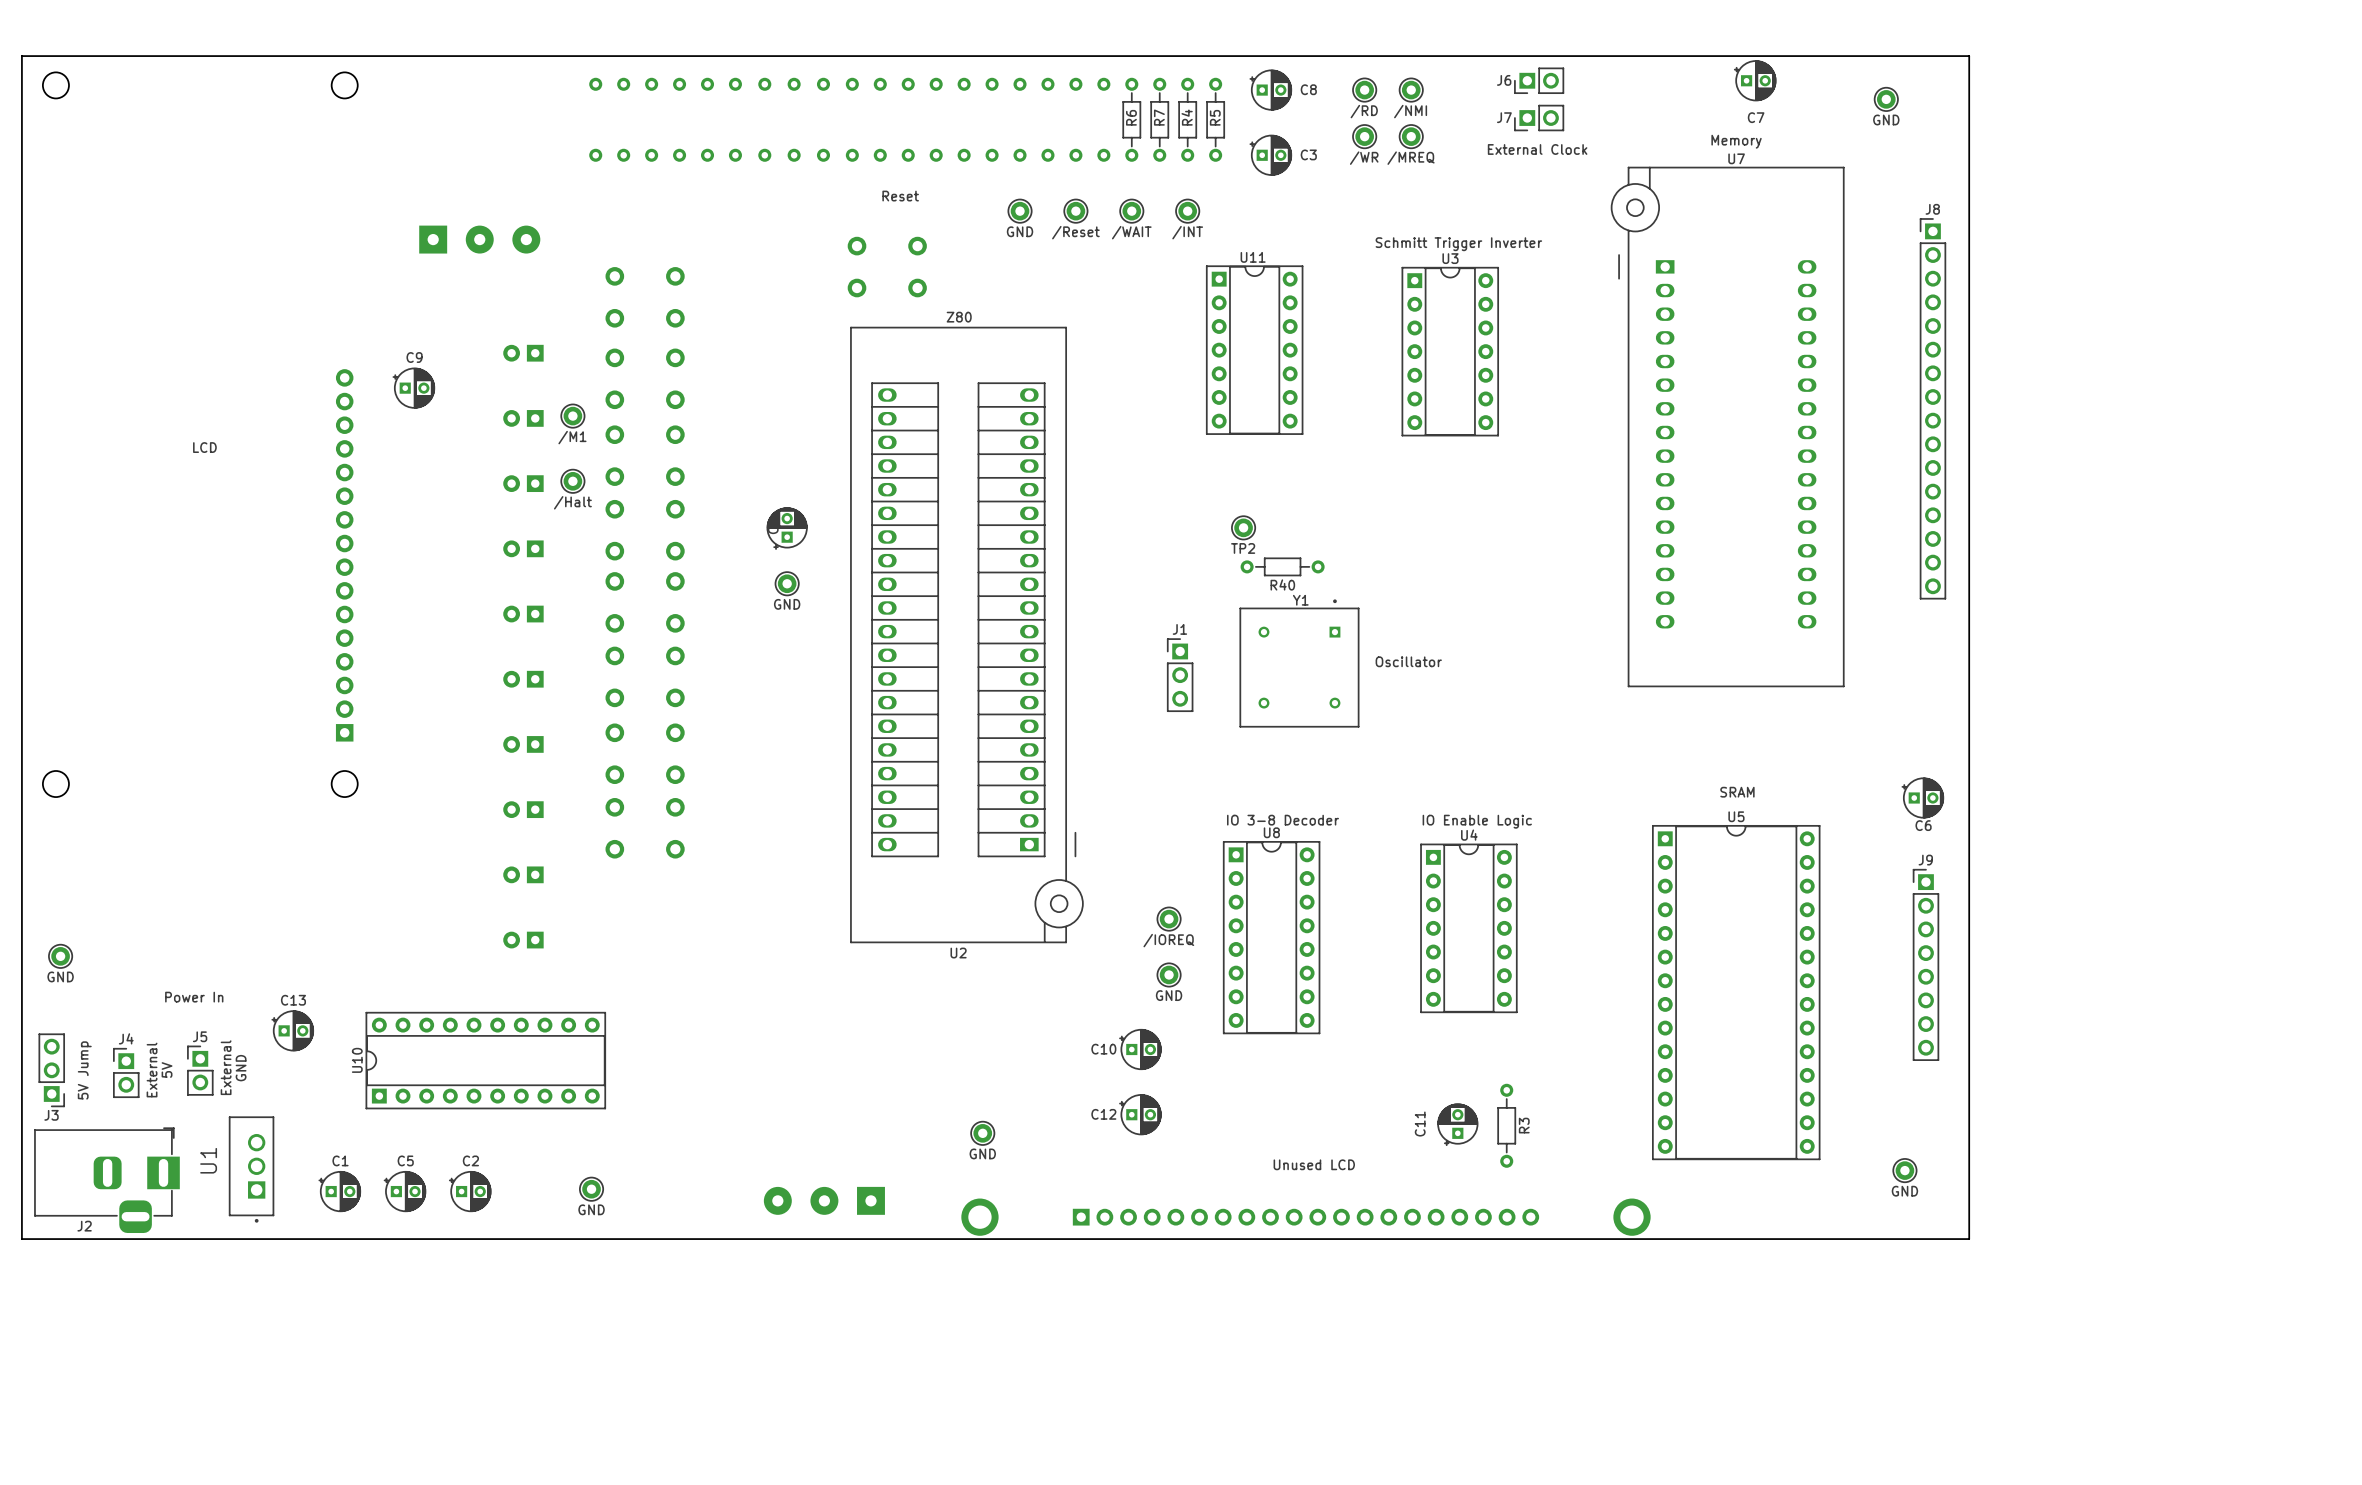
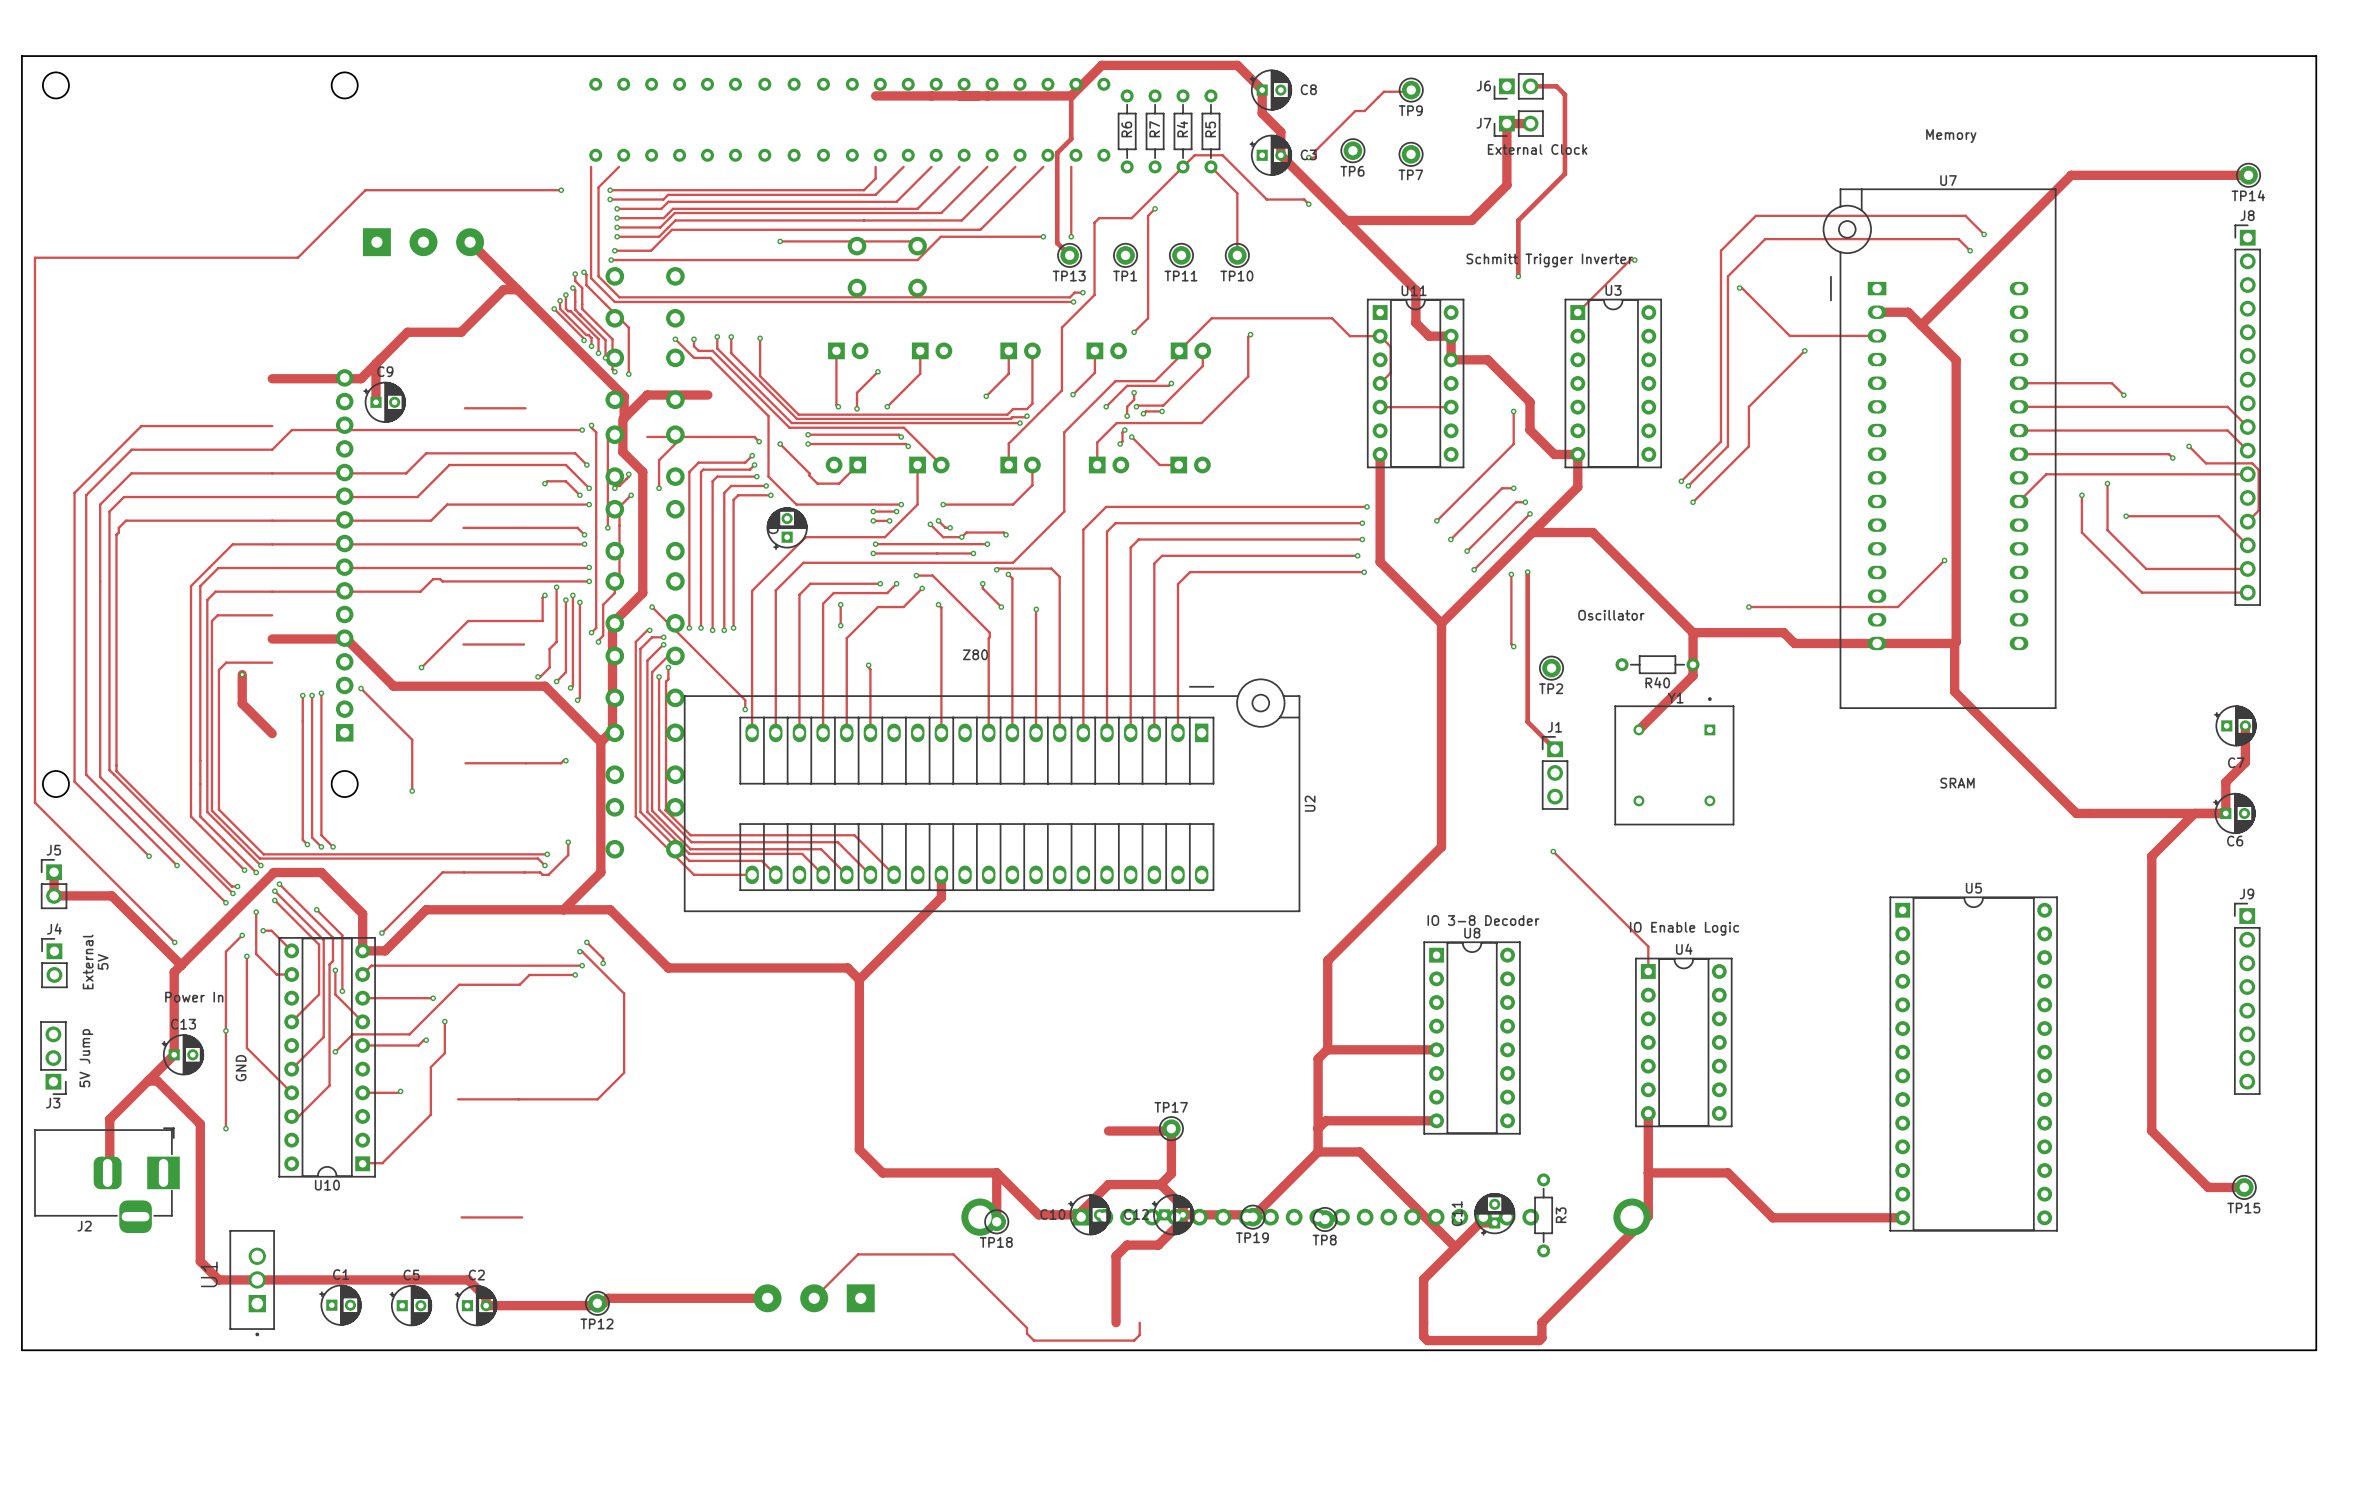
board edge: (1969, 56) (1969, 1239) (21, 1239) -> (1969, 56) (2316, 56) (2316, 1350) (21, 1350) (21, 1239)
J6 position: (1539, 80) -> (1518, 86)
C7 position: (1755, 80) -> (2235, 725)
track: none -> (1530, 86) (1556, 86) (1564, 94) (1564, 173) (1518, 220) (1518, 276)
/RD: (1364, 90) -> none
track: none -> (1409, 91) (1383, 91) (1364, 111) (1355, 111) (1315, 150) (1315, 157) (1308, 157)
track: none -> (875, 95) (1071, 95)
track: none -> (1071, 95) (1101, 65) (1237, 65) (1262, 90) (1262, 113) (1280, 131) (1280, 155) (1415, 290) (1415, 322) (1429, 336) (1451, 336) (1451, 359) (1487, 359) (1530, 402) (1530, 430) (1554, 454) (1577, 454) (1577, 487) (1441, 623)
track: none -> (1071, 95) (1071, 138) (1057, 152) (1057, 243) (1069, 255)
GND: (1886, 99) -> none
/NMI name: /NMI (1410, 111) -> TP9 (1410, 110)
J7 position: (1539, 118) -> (1518, 123)
R6 position: (1131, 119) -> (1127, 131)
R7 position: (1159, 119) -> (1155, 131)
R4 position: (1187, 119) -> (1183, 131)
R5 position: (1215, 119) -> (1210, 131)
track: none -> (1530, 123) (1506, 123) (1506, 185) (1471, 220) (1346, 220)
/WR: (1364, 136) -> none
/MREQ: (1411, 136) -> none
text position: Memory (1736, 141) -> Memory (1951, 136)
TP6: none -> (1352, 150)
TP7: none -> (1411, 154)
via: none -> (1308, 157)
track: none -> (591, 166) (591, 278) (614, 301) (1073, 301)
track: none -> (619, 166) (598, 187) (598, 276) (619, 297) (1070, 297) (1074, 292) (1082, 292)
track: none -> (875, 166) (875, 178) (864, 190) (610, 190)
track: none -> (903, 166) (875, 194) (668, 194) (663, 199) (610, 199)
track: none -> (931, 166) (896, 201) (668, 201) (661, 208) (617, 208)
track: none -> (959, 166) (917, 208) (673, 208) (663, 218) (617, 218)
track: none -> (987, 166) (941, 213) (674, 213) (660, 227) (617, 227)
track: none -> (1015, 166) (961, 220) (675, 220) (659, 236) (617, 236)
track: none -> (1043, 166) (980, 229) (671, 229) (651, 250) (614, 250)
track: none -> (1071, 166) (1071, 236)
track: none -> (1210, 166) (1237, 193) (1237, 255)
track: none -> (2248, 175) (2071, 175) (1921, 325)
TP14: none -> (2248, 175)
track: none -> (561, 190) (365, 190) (297, 257) (34, 257) (34, 802) (174, 942)
via: none -> (561, 190)
via: none -> (610, 190)
text: Reset (900, 196) -> none
via: none -> (610, 199)
track: none -> (1308, 204) (1304, 199) (1266, 199) (1222, 155) (1194, 155) (1131, 218) (1099, 218) (1094, 222) (1094, 295) (1061, 327) (1061, 390) (1008, 443) (1008, 464)
via: none -> (1308, 204)
via: none -> (617, 208)
track: none -> (1155, 208) (1148, 215) (1148, 318) (1134, 332)
via: none -> (1155, 208)
GND: (1020, 211) -> none
/Reset: (1075, 211) -> none
/WAIT: (1131, 211) -> none
/INT: (1187, 211) -> none
via: none -> (617, 218)
via: none -> (617, 227)
track: none -> (1984, 234) (1965, 215) (1755, 215) (1720, 250) (1720, 441) (1681, 481)
via: none -> (1984, 234)
via: none -> (617, 236)
track: none -> (1043, 236) (940, 236) (917, 260) (610, 260)
via: none -> (1043, 236)
via: none -> (1071, 236)
part position: (479, 239) -> (423, 242)
track: none -> (780, 241) (922, 241)
via: none -> (780, 241)
track: none -> (470, 242) (624, 396) (624, 418) (647, 395) (707, 395)
text position: Schmitt Trigger Inverter (1458, 244) -> Schmitt Trigger Inverter (1549, 260)
via: none -> (614, 250)
track: none -> (1970, 250) (1958, 239) (1765, 239) (1727, 276) (1727, 446) (1688, 485)
via: none -> (1970, 250)
TP13: none -> (1069, 255)
TP1: none -> (1125, 255)
TP11: none -> (1181, 255)
TP10: none -> (1237, 255)
via: none -> (611, 260)
track: none -> (1634, 260) (1630, 260) (1577, 312)
via: none -> (1634, 260)
track: none -> (583, 272) (586, 274) (586, 285) (628, 327) (628, 374)
via: none -> (583, 272)
track: none -> (575, 274) (575, 281) (582, 288) (582, 308) (612, 339) (612, 369) (614, 371)
via: none -> (575, 274)
via: none -> (1518, 276)
track: none -> (572, 288) (575, 290) (575, 309) (605, 340) (605, 357)
via: none -> (572, 288)
track: none -> (1739, 288) (1741, 288) (1789, 335) (1877, 335)
via: none -> (1739, 288)
track: none -> (517, 289) (503, 289) (461, 332) (407, 332) (361, 378) (272, 378)
via: none -> (1082, 292)
track: none -> (565, 295) (565, 308) (598, 339) (598, 353)
via: none -> (565, 295)
track: none -> (560, 300) (560, 308) (591, 337) (591, 346)
via: none -> (560, 300)
via: none -> (1073, 301)
track: none -> (554, 308) (584, 340)
via: none -> (554, 308)
track: none -> (1877, 312) (1908, 312) (1956, 360) (1954, 643)
text: Z80 (959, 317) -> none
via: none -> (1134, 332)
track: none -> (1250, 334) (1248, 336) (1248, 376) (1201, 423) (1116, 423) (1097, 442) (1097, 464)
via: none -> (1250, 334)
track: none -> (717, 336) (717, 348) (791, 423) (1020, 423)
via: none -> (717, 336)
track: none -> (731, 336) (731, 353) (796, 418) (1010, 418) (1027, 416)
via: none -> (731, 336)
track: none -> (760, 338) (760, 376) (798, 414) (1007, 414) (1013, 409) (1027, 409) (1032, 403) (1032, 350)
via: none -> (760, 338)
track: none -> (675, 339) (694, 357) (710, 357) (768, 416) (768, 476) (796, 504) (901, 504)
via: none -> (675, 339)
track: none -> (694, 339) (694, 346) (698, 350) (712, 350) (789, 427) (903, 427) (941, 464)
via: none -> (694, 339)
via: none -> (584, 340)
via: none -> (591, 346)
track: none -> (836, 350) (836, 404) (838, 406)
part: none -> (848, 350)
track: none -> (920, 350) (920, 373) (887, 406)
part: none -> (932, 350)
track: none -> (1008, 350) (1008, 373) (986, 396)
part: none -> (1020, 350)
track: none -> (1094, 350) (1094, 372) (1073, 394)
part: none -> (1106, 350)
part: none -> (1190, 350)
track: none -> (1202, 350) (1202, 366) (1163, 405) (1136, 406)
U11 position: (1254, 350) -> (1415, 383)
track: none -> (1804, 350) (1748, 406) (1748, 446) (1693, 502)
via: none -> (1804, 350)
U3 position: (1450, 351) -> (1613, 383)
part: (523, 353) -> none
via: none -> (598, 353)
via: none -> (605, 357)
track: none -> (375, 363) (375, 402)
via: none -> (614, 371)
track: none -> (877, 371) (857, 392) (857, 408)
via: none -> (877, 371)
via: none -> (628, 374)
track: none -> (1171, 383) (1169, 385) (1127, 385) (1106, 406)
via: none -> (1171, 383)
track: none -> (1380, 383) (1390, 373) (1390, 346) (1380, 336) (1349, 336) (1332, 318) (1211, 318) (1179, 350) (1179, 357) (1155, 381) (1115, 381) (1064, 432) (1064, 511) (1013, 562) (803, 562) (775, 590) (775, 732)
track: none -> (2019, 383) (2111, 383) (2123, 395)
C9 position: (413, 388) -> (384, 402)
track: none -> (1134, 392) (1134, 399) (1127, 406) (1127, 416)
via: none -> (1134, 392)
via: none -> (1073, 394)
via: none -> (2123, 395)
via: none -> (986, 396)
via: none -> (838, 406)
via: none -> (887, 406)
via: none -> (1106, 406)
via: none -> (1136, 406)
track: none -> (2019, 406) (2227, 406) (2247, 426)
track: none -> (1380, 407) (1451, 407)
track: none -> (464, 408) (525, 408)
via: none -> (857, 408)
J8 position: (1932, 408) -> (2247, 415)
track: none -> (1162, 411) (1145, 411) (1143, 413)
via: none -> (1162, 411)
track: none -> (1513, 411) (1513, 444) (1436, 520)
via: none -> (1513, 411)
via: none -> (1143, 413)
/M1: (572, 416) -> none
via: none -> (1027, 416)
via: none -> (1127, 416)
part: (523, 418) -> none
track: none -> (622, 419) (622, 452) (642, 471) (642, 593) (612, 623) (612, 730) (600, 742)
via: none -> (1020, 423)
track: none -> (591, 425) (596, 432) (596, 628) (591, 632)
via: none -> (591, 425)
track: none -> (272, 426) (141, 426) (74, 492) (74, 781) (149, 856)
U7 position: (1727, 426) -> (1939, 448)
track: none -> (582, 430) (291, 430) (272, 449) (131, 449) (86, 495) (86, 774) (177, 865)
via: none -> (582, 430)
track: none -> (1124, 430) (1120, 444)
via: none -> (1124, 430)
track: none -> (2019, 430) (2227, 430) (2247, 450)
track: none -> (607, 432) (607, 527)
track: none -> (808, 434) (898, 434) (901, 437)
via: none -> (808, 434)
track: none -> (647, 436) (754, 436) (759, 441)
track: none -> (682, 436) (659, 460) (659, 488)
via: none -> (901, 437)
track: none -> (1131, 437) (1159, 464) (1178, 464)
via: none -> (1131, 437)
via: none -> (759, 441)
track: none -> (780, 444) (817, 483) (839, 483) (857, 464)
via: none -> (780, 444)
track: none -> (808, 444) (905, 444) (908, 446)
via: none -> (808, 444)
via: none -> (1120, 444)
via: none -> (908, 446)
track: none -> (2189, 446) (2206, 463) (2252, 463) (2258, 469) (2258, 510) (2247, 521)
via: none -> (2189, 446)
text: LCD (204, 447) -> none
track: none -> (1380, 454) (1380, 561) (1441, 623)
track: none -> (2019, 454) (2168, 454) (2172, 458)
track: none -> (752, 455) (745, 462) (698, 462) (689, 471) (689, 628)
via: none -> (752, 455)
via: none -> (2172, 458)
track: none -> (586, 464) (575, 453) (426, 453) (406, 473) (131, 473) (100, 504) (100, 777) (225, 902)
via: none -> (586, 464)
track: none -> (754, 464) (749, 469) (703, 469) (700, 471) (700, 628)
via: none -> (754, 464)
part: none -> (845, 464)
track: none -> (917, 464) (917, 504) (884, 537) (805, 537) (752, 590) (752, 732)
part: none -> (929, 464)
part: none -> (1020, 464)
track: none -> (1032, 464) (1032, 485) (1013, 504) (943, 504)
part: none -> (1109, 464)
part: none -> (1190, 464)
track: none -> (628, 474) (628, 476) (614, 488)
via: none -> (628, 474)
track: none -> (2247, 474) (2046, 474) (2019, 501)
track: none -> (756, 476) (717, 476) (712, 481) (712, 630)
via: none -> (756, 476)
/Halt: (572, 481) -> none
via: none -> (1681, 481)
part: (523, 483) -> none
track: none -> (544, 483) (547, 481) (565, 481) (579, 495)
via: none -> (544, 483)
track: none -> (2107, 483) (2107, 530) (2146, 568) (2247, 568)
via: none -> (2107, 483)
track: none -> (766, 485) (731, 485) (724, 492) (724, 630)
via: none -> (766, 485)
via: none -> (1688, 485)
track: none -> (589, 488) (565, 464) (449, 464) (417, 497) (124, 497) (109, 511) (109, 770) (232, 893)
via: none -> (589, 488)
via: none -> (614, 488)
via: none -> (659, 488)
track: none -> (1513, 488) (1502, 488) (1450, 539)
via: none -> (1513, 488)
via: none -> (579, 495)
track: none -> (631, 495) (619, 506) (619, 583) (614, 588) (614, 593) (603, 604) (603, 635) (598, 641)
via: none -> (631, 495)
track: none -> (770, 495) (738, 495) (733, 499) (733, 628)
via: none -> (770, 495)
track: none -> (2081, 495) (2081, 532) (2141, 592) (2247, 592)
via: none -> (2081, 495)
track: none -> (1525, 502) (1516, 502) (1467, 551)
via: none -> (1525, 502)
via: none -> (1693, 502)
track: none -> (589, 504) (447, 504) (431, 520) (125, 520) (118, 527) (116, 534) (116, 771) (231, 886) (237, 886)
via: none -> (589, 504)
via: none -> (901, 504)
via: none -> (943, 504)
track: none -> (1367, 506) (1106, 506) (1083, 529) (1083, 732)
via: none -> (1367, 506)
track: none -> (873, 511) (896, 511)
via: none -> (873, 511)
via: none -> (896, 511)
track: none -> (1530, 513) (1474, 569)
via: none -> (1530, 513)
track: none -> (2126, 516) (2218, 516) (2247, 545)
via: none -> (2126, 516)
track: none -> (873, 520) (889, 520)
via: none -> (873, 520)
via: none -> (889, 520)
track: none -> (938, 520) (945, 527) (950, 527)
via: none -> (938, 520)
via: none -> (1436, 520)
track: none -> (1362, 523) (1115, 523) (1107, 531) (1107, 732)
via: none -> (1362, 523)
track: none -> (930, 524) (943, 537) (961, 537) (966, 532) (1003, 532) (1006, 534)
via: none -> (930, 524)
track: none -> (463, 527) (577, 527) (584, 534)
via: none -> (607, 527)
via: none -> (950, 527)
TP2 position: (1243, 527) -> (1551, 668)
track: none -> (1532, 532) (1592, 532) (1693, 632)
via: none -> (584, 534)
via: none -> (1006, 534)
via: none -> (961, 537)
track: none -> (1362, 539) (1138, 539) (1130, 547) (1130, 732)
via: none -> (1362, 539)
via: none -> (1450, 539)
track: none -> (584, 544) (232, 544) (191, 586) (191, 816) (244, 870)
via: none -> (584, 544)
track: none -> (875, 544) (987, 544)
via: none -> (875, 544)
via: none -> (987, 544)
part: (523, 548) -> none
via: none -> (1467, 551)
track: none -> (873, 553) (973, 553)
via: none -> (873, 553)
via: none -> (973, 553)
track: none -> (1357, 555) (1162, 555) (1154, 563) (1154, 732)
via: none -> (1357, 555)
track: none -> (1944, 560) (1897, 607) (1748, 607)
via: none -> (1944, 560)
R40 position: (1282, 566) -> (1657, 664)
track: none -> (589, 567) (218, 568) (200, 586) (200, 816) (256, 872)
via: none -> (589, 567)
track: none -> (996, 569) (1051, 568) (1059, 576) (1059, 732)
via: none -> (996, 569)
via: none -> (1474, 569)
track: none -> (1364, 572) (1190, 572) (1178, 584) (1178, 732)
via: none -> (1364, 572)
track: none -> (1527, 572) (1527, 721) (1555, 749)
via: none -> (1527, 572)
track: none -> (1008, 574) (1012, 578) (1012, 732)
via: none -> (1008, 574)
track: none -> (1511, 574) (1511, 644) (1513, 646)
via: none -> (1511, 574)
track: none -> (916, 575) (932, 575) (989, 632) (988, 732)
via: none -> (916, 575)
track: none -> (589, 581) (442, 581) (440, 579) (433, 579) (420, 591) (215, 591) (207, 600) (207, 811) (260, 865)
via: none -> (589, 581)
GND: (787, 583) -> none
track: none -> (880, 583) (810, 583) (799, 594) (799, 732)
via: none -> (880, 583)
track: none -> (896, 583) (887, 593) (833, 593) (823, 603) (823, 732)
via: none -> (896, 583)
track: none -> (982, 583) (982, 588) (1001, 607)
via: none -> (982, 583)
track: none -> (556, 587) (556, 641) (549, 648) (549, 667) (537, 676)
via: none -> (556, 587)
track: none -> (922, 588) (903, 607) (877, 607) (846, 638) (846, 732)
via: none -> (922, 588)
track: none -> (544, 595) (542, 597) (542, 621) (468, 621) (421, 667)
via: none -> (544, 595)
track: none -> (572, 595) (572, 686) (570, 688)
via: none -> (572, 595)
track: none -> (565, 600) (565, 672) (556, 681)
via: none -> (565, 600)
track: none -> (579, 602) (579, 697) (577, 700)
via: none -> (579, 602)
track: none -> (840, 604) (840, 625)
via: none -> (840, 604)
track: none -> (938, 604) (941, 607) (941, 732)
via: none -> (938, 604)
track: none -> (652, 607) (745, 700) (745, 709)
via: none -> (652, 607)
via: none -> (1001, 607)
via: none -> (1748, 607)
track: none -> (1036, 609) (1036, 732)
via: none -> (1036, 609)
part: (523, 614) -> none
track: none -> (272, 615) (217, 615) (211, 621) (211, 810) (259, 858) (537, 858) (544, 865)
track: none -> (1441, 623) (1441, 846) (1327, 960) (1327, 1049)
via: none -> (840, 625)
via: none -> (689, 628)
via: none -> (700, 628)
via: none -> (733, 628)
track: none -> (649, 630) (635, 641) (635, 816) (694, 874) (752, 874)
via: none -> (649, 630)
via: none -> (712, 630)
via: none -> (724, 630)
via: none -> (591, 632)
track: none -> (1693, 632) (1693, 675) (1638, 729)
track: none -> (1693, 632) (1783, 632) (1794, 643) (1954, 643)
U2 rotation: 0° (966, 634) -> 90° counterclockwise (992, 795)
track: none -> (663, 637) (652, 637) (640, 648) (640, 811) (689, 860) (761, 860) (775, 874)
via: none -> (663, 637)
track: none -> (272, 638) (346, 638) (393, 686) (544, 686) (600, 742)
via: none -> (598, 641)
track: none -> (1954, 643) (1954, 691) (2076, 813) (2225, 813) (2225, 782) (2245, 762) (2245, 725)
track: none -> (463, 644) (524, 644)
track: none -> (663, 644) (647, 660) (647, 811) (689, 853) (802, 853) (823, 874)
via: none -> (663, 644)
via: none -> (1513, 646)
track: none -> (670, 653) (652, 672) (652, 810) (690, 849) (821, 849) (846, 874)
text: none -> Z80 (975, 654)
text position: Oscillator (1408, 661) -> Oscillator (1611, 615)
track: none -> (272, 662) (226, 662) (218, 669) (218, 809) (263, 854) (547, 854)
Y1 position: (1299, 663) -> (1674, 761)
track: none -> (868, 665) (870, 669) (870, 732)
via: none -> (868, 665)
via: none -> (421, 667)
track: none -> (668, 667) (668, 679) (666, 681) (665, 810) (690, 835) (854, 835) (894, 874)
via: none -> (668, 667)
track: none -> (242, 674) (242, 703) (272, 733)
via: none -> (242, 674)
J1 position: (1180, 675) -> (1555, 772)
via: none -> (537, 676)
track: none -> (659, 676) (659, 809) (691, 842) (837, 842) (870, 874)
via: none -> (659, 676)
part: (523, 679) -> none
via: none -> (556, 681)
via: none -> (570, 687)
track: none -> (360, 688) (412, 739) (412, 791)
via: none -> (360, 688)
track: none -> (321, 693) (321, 835) (333, 846)
via: none -> (321, 693)
track: none -> (302, 695) (302, 839) (307, 844)
via: none -> (302, 695)
track: none -> (312, 695) (312, 837) (321, 846)
via: none -> (312, 695)
via: none -> (577, 700)
via: none -> (745, 709)
track: none -> (600, 742) (600, 872) (563, 909)
part: (523, 744) -> none
track: none -> (565, 760) (561, 763) (465, 763)
via: none -> (565, 760)
via: none -> (412, 791)
text position: SRAM (1737, 792) -> SRAM (1957, 783)
C6 position: (1922, 798) -> (2234, 813)
part: (523, 809) -> none
track: none -> (2194, 813) (2151, 856) (2151, 1131) (2208, 1187) (2244, 1187)
text position: IO 3-8 Decoder (1283, 820) -> IO 3-8 Decoder (1483, 920)
text: IO Enable Logic (1477, 821) -> none
track: none -> (568, 842) (568, 855) (548, 874) (542, 874) (540, 872) (442, 872) (381, 933)
via: none -> (568, 842)
via: none -> (307, 844)
via: none -> (321, 846)
via: none -> (333, 846)
track: none -> (1553, 851) (1648, 946) (1648, 971)
via: none -> (1553, 851)
via: none -> (547, 854)
via: none -> (149, 856)
via: none -> (177, 865)
via: none -> (260, 865)
via: none -> (544, 865)
via: none -> (244, 870)
track: none -> (54, 872) (54, 895) (111, 895) (181, 965)
via: none -> (256, 872)
part: (523, 874) -> none
track: none -> (941, 874) (941, 897) (859, 979)
track: none -> (279, 884) (332, 937) (332, 960)
via: none -> (279, 884)
via: none -> (237, 886)
track: none -> (274, 891) (323, 940) (323, 1037) (291, 1069)
via: none -> (274, 891)
via: none -> (232, 893)
track: none -> (274, 900) (319, 944) (319, 994) (291, 1021)
via: none -> (274, 900)
via: none -> (225, 902)
track: none -> (316, 909) (342, 935) (342, 991)
via: none -> (316, 909)
track: none -> (256, 912) (256, 954) (276, 974) (291, 974)
via: none -> (256, 912)
/IOREQ: (1169, 919) -> none
U4 position: (1468, 928) -> (1683, 1042)
text: none -> IO Enable Logic (1684, 928)
track: none -> (263, 930) (271, 930) (291, 950)
via: none -> (263, 930)
via: none -> (381, 933)
track: none -> (242, 935) (225, 951) (225, 1128)
via: none -> (242, 935)
U8 position: (1271, 937) -> (1472, 1038)
part: (523, 940) -> none
via: none -> (174, 942)
track: none -> (586, 942) (603, 958) (603, 963)
via: none -> (586, 942)
track: none -> (579, 951) (582, 951) (624, 993) (624, 1072) (597, 1099) (458, 1099)
via: none -> (579, 951)
GND: (60, 956) -> none
track: none -> (246, 956) (246, 1048) (291, 1092)
via: none -> (246, 956)
text: none -> External (88, 961)
track: none -> (333, 961) (329, 964) (329, 1085) (298, 1116) (291, 1116)
via: none -> (603, 963)
J9 position: (1925, 964) -> (2247, 998)
track: none -> (582, 965) (371, 965) (362, 974)
via: none -> (582, 965)
track: none -> (335, 970) (335, 994) (362, 1021)
via: none -> (335, 970)
track: none -> (575, 974) (529, 974) (519, 984) (459, 984) (409, 1034) (352, 1034) (335, 1051)
via: none -> (575, 974)
GND: (1169, 974) -> none
track: none -> (859, 979) (859, 1149) (882, 1172) (996, 1172)
track: none -> (859, 979) (847, 967) (668, 967) (610, 909) (426, 909) (385, 950) (362, 950) (362, 913) (321, 872) (273, 872) (174, 972) (174, 1054) (109, 1119) (109, 1177)
via: none -> (342, 991)
U5 position: (1736, 992) -> (1973, 1064)
track: none -> (362, 998) (433, 998)
via: none -> (433, 998)
track: none -> (444, 1021) (444, 1053) (430, 1067) (430, 1114) (382, 1163) (362, 1163)
via: none -> (444, 1021)
via: none -> (225, 1030)
C13 position: (292, 1030) -> (182, 1054)
track: none -> (426, 1040) (418, 1045) (362, 1045)
via: none -> (426, 1040)
C10 position: (1140, 1049) -> (1089, 1214)
track: none -> (1327, 1049) (1318, 1058) (1318, 1151)
track: none -> (1327, 1049) (1436, 1049)
via: none -> (335, 1051)
U10 rotation: 0° (485, 1060) -> 90° counterclockwise (327, 1057)
U10 position: (485, 1060) -> (327, 1057)
text: External (226, 1067) -> none
J3 position: (51, 1070) -> (53, 1058)
text position: 5V Jump (84, 1070) -> 5V Jump (86, 1058)
text: External (152, 1070) -> none
text position: 5V (167, 1070) -> 5V (103, 961)
J5 position: (200, 1070) -> (54, 884)
J4 position: (126, 1072) -> (54, 963)
track: none -> (148, 1081) (157, 1081) (200, 1124) (200, 1261) (218, 1279) (468, 1279) (486, 1297) (486, 1305) (595, 1305) (597, 1303) (603, 1303) (608, 1298) (767, 1298)
track: none -> (400, 1091) (362, 1092)
via: none -> (400, 1091)
track: none -> (1648, 1113) (1648, 1216) (1541, 1322) (1541, 1337) (1539, 1340) (1427, 1340) (1423, 1336) (1423, 1279) (1479, 1222) (1494, 1222)
C12 position: (1140, 1114) -> (1173, 1214)
track: none -> (1436, 1120) (1325, 1120) (1318, 1128)
C11 position: (1457, 1124) -> (1494, 1214)
R3 position: (1506, 1125) -> (1543, 1215)
via: none -> (225, 1128)
TP17: none -> (1171, 1128)
track: none -> (1108, 1131) (1169, 1131) (1171, 1128) (1171, 1173) (1160, 1184)
GND: (982, 1133) -> none
track: none -> (1318, 1151) (1252, 1217) (1250, 1214) (1183, 1214)
track: none -> (1318, 1151) (1360, 1151) (1455, 1247)
text: Unused LCD (1314, 1164) -> none
U1 position: (251, 1169) -> (252, 1283)
GND: (1904, 1170) -> none
track: none -> (996, 1172) (1038, 1214) (1080, 1214) (1080, 1212) (1108, 1184) (1160, 1184)
track: none -> (996, 1172) (996, 1221)
track: none -> (1648, 1172) (1727, 1172) (1772, 1217) (1902, 1217)
track: none -> (1160, 1184) (1183, 1206) (1183, 1220) (1158, 1245) (1127, 1245) (1116, 1256) (1116, 1322)
TP15: none -> (2244, 1187)
GND: (591, 1189) -> none
C1 position: (339, 1191) -> (340, 1305)
C5 position: (405, 1191) -> (410, 1305)
C2 position: (470, 1191) -> (476, 1305)
part position: (824, 1200) -> (814, 1298)
track: none -> (461, 1217) (522, 1217)
TP19: none -> (1252, 1217)
TP8: none -> (1325, 1219)
TP18: none -> (996, 1221)
track: none -> (814, 1298) (858, 1254) (953, 1254) (1027, 1327) (1027, 1333) (1033, 1340) (1134, 1340) (1139, 1335) (1139, 1322)
TP12: none -> (597, 1303)

